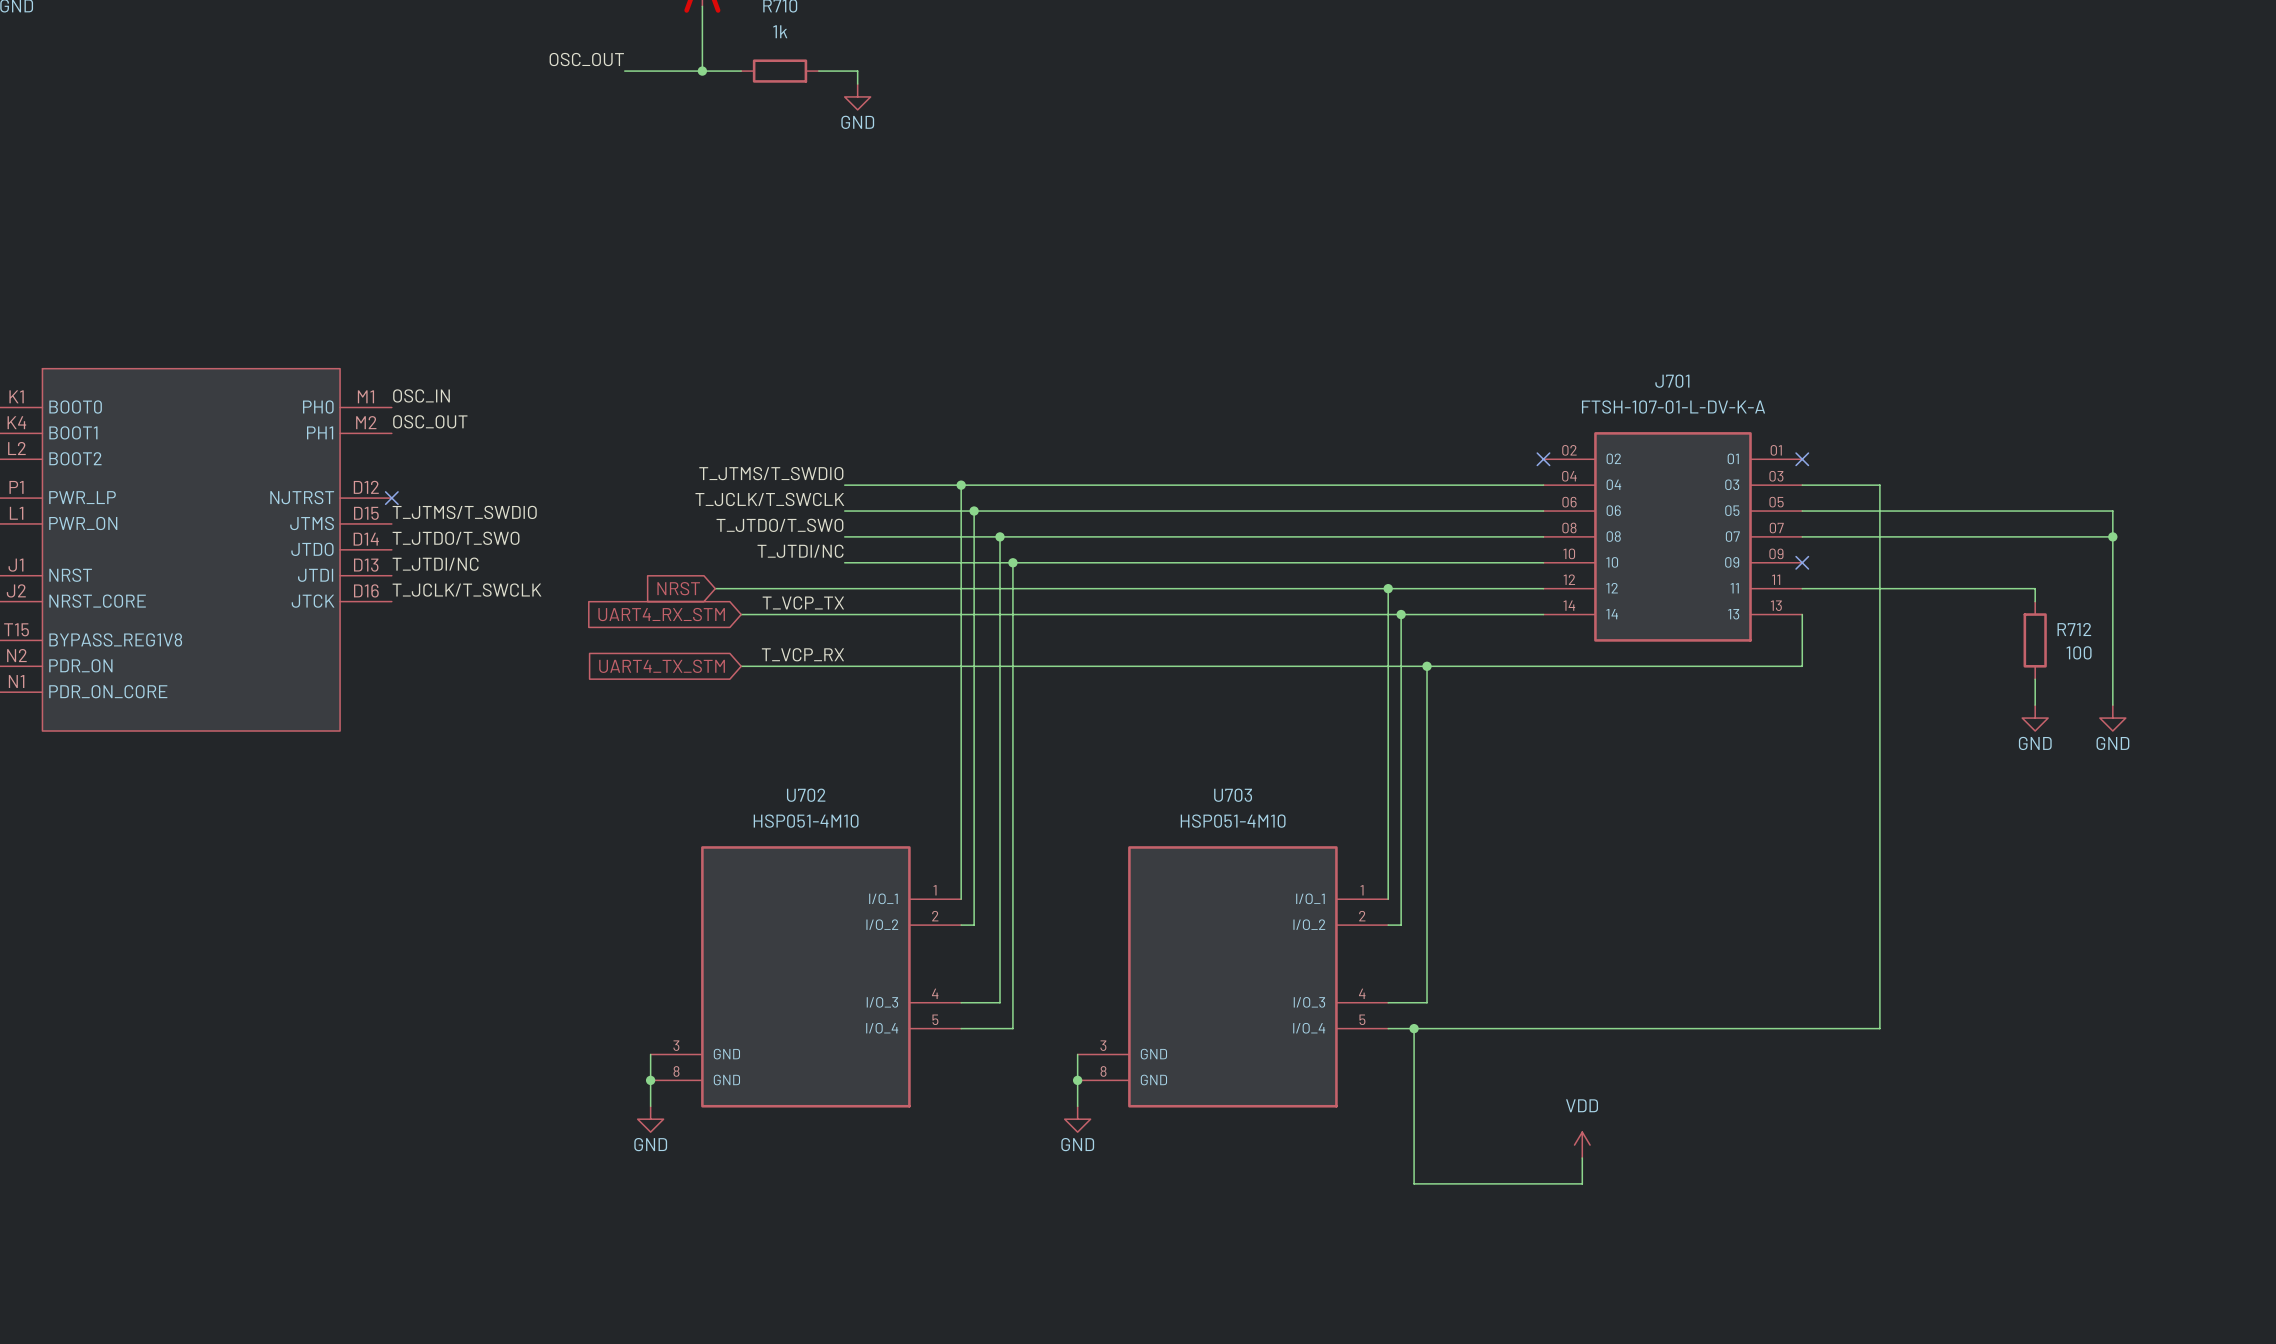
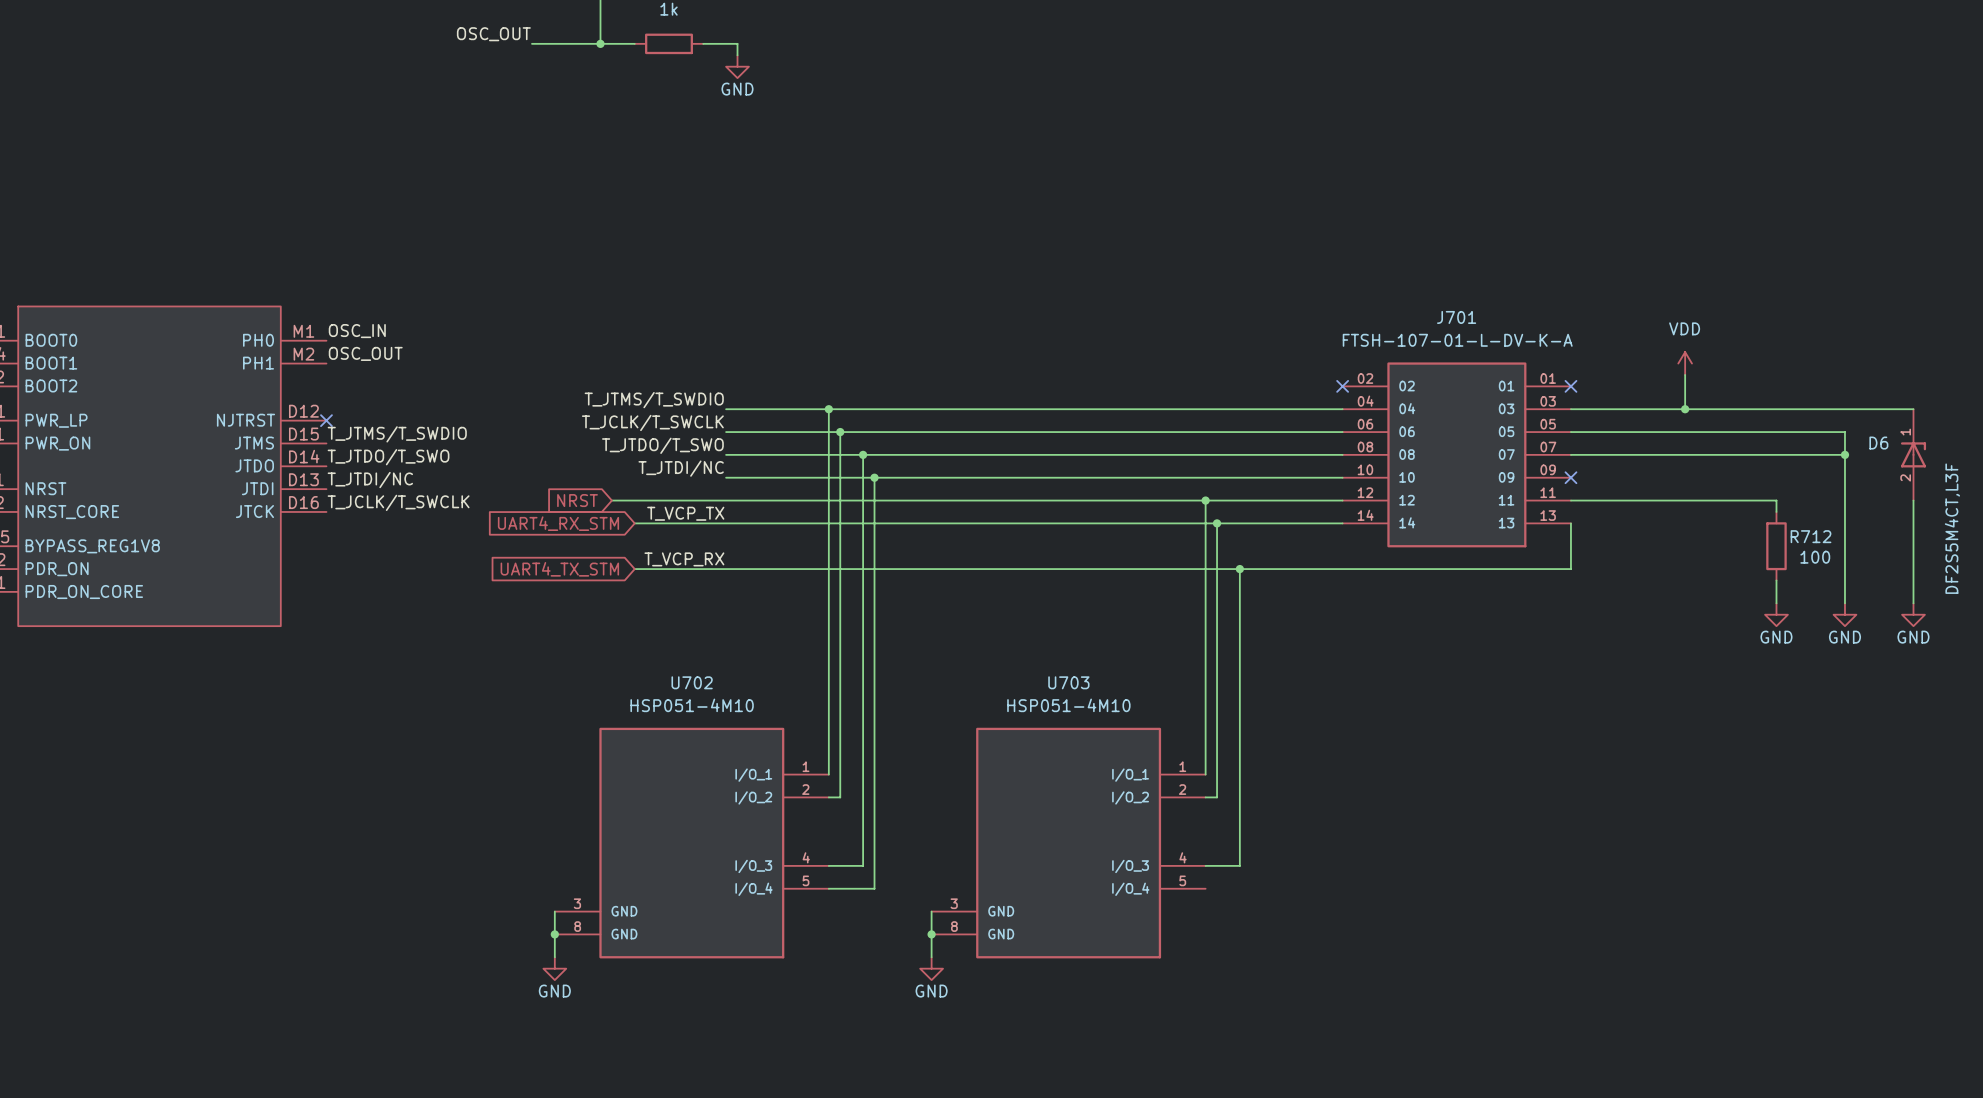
power symbol: none -> VDD (1685, 363)
wire: none -> (1685, 374) (1685, 409)
wire: (1879, 485) (1879, 1028) (1388, 1028) -> (1639, 409) (1913, 409)
junction: none -> (1685, 409)
D6: none -> DF2S5M4CT,L3F (1913, 454)
wire: none -> (1913, 500) (1913, 603)
power symbol: none -> GND (1913, 614)
wire: (1414, 1028) (1414, 1183) (1582, 1183) (1582, 1158) -> none
junction: (1414, 1028) -> none
power symbol: VDD (1582, 1145) -> none

